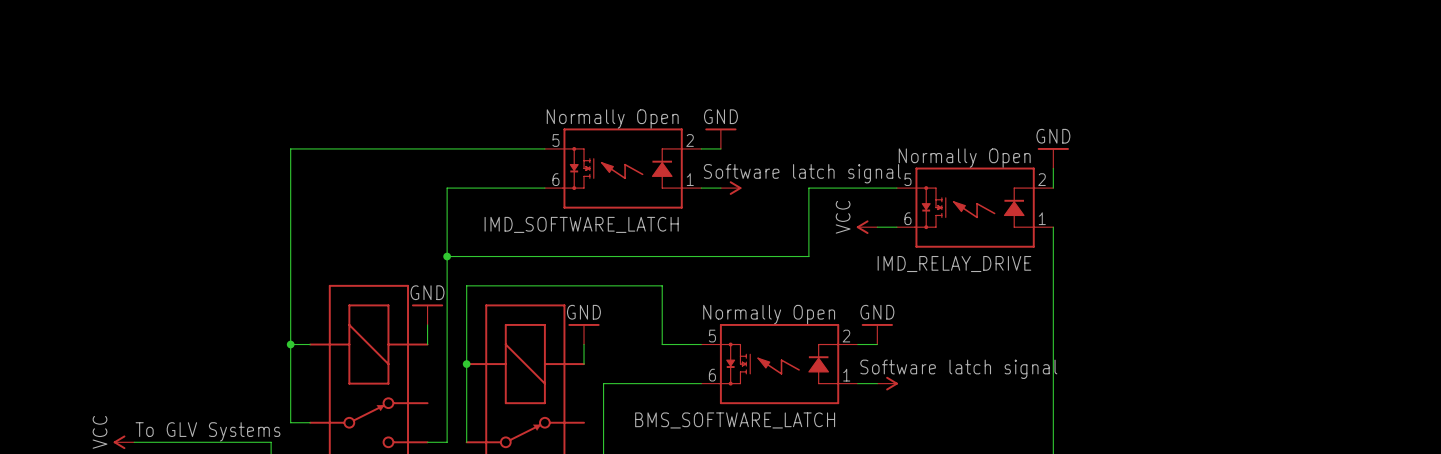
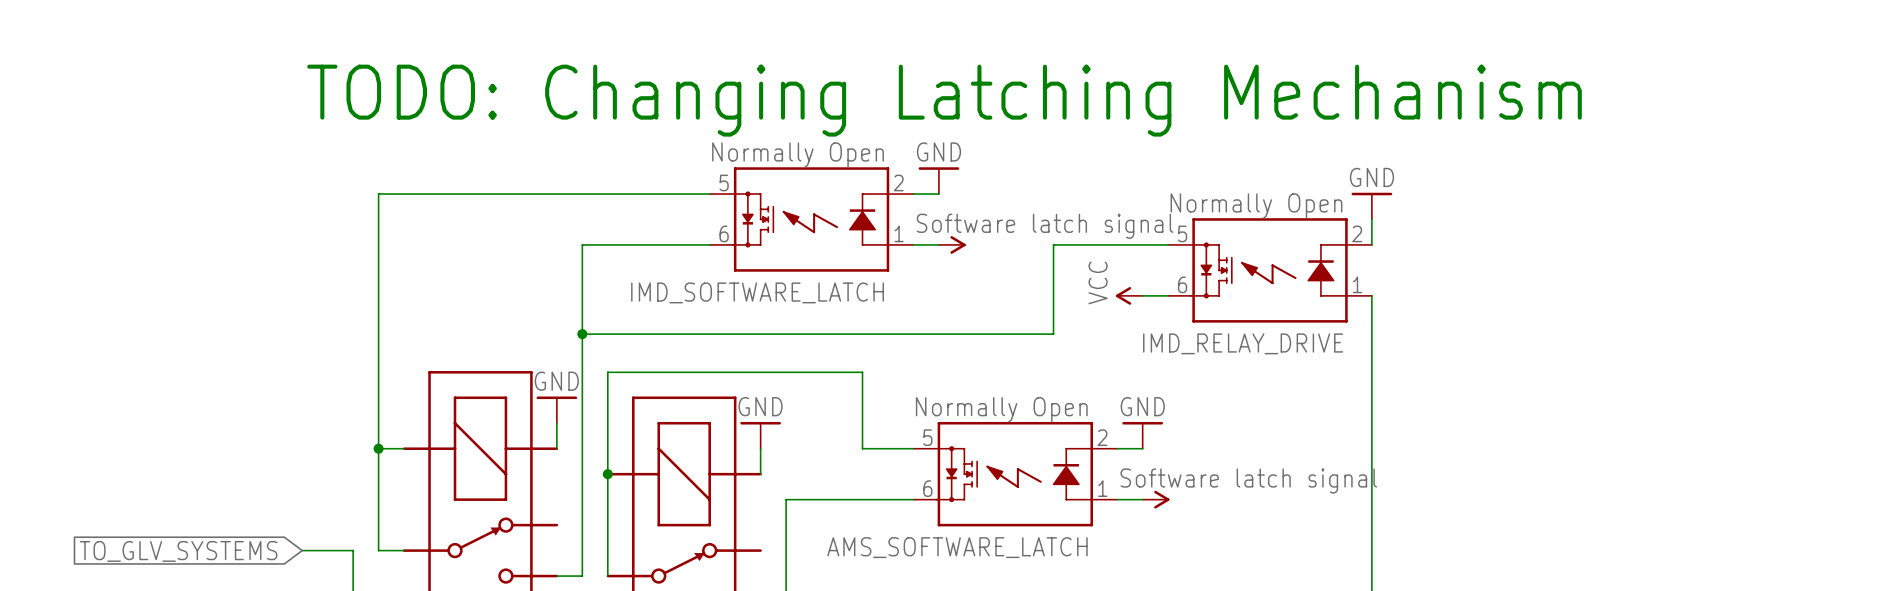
text: none -> TODO: Changing Latching Mechanism (944, 100)
BMS_SOFTWARE_LATCH name: BMS_SOFTWARE_LATCH (735, 420) -> AMS_SOFTWARE_LATCH (957, 547)
global label: none -> TO_GLV_SYSTEMS (178, 551)
text: To GLV Systems (207, 431) -> none
power symbol: VCC (123, 442) -> none
wire: (134, 442) (271, 442) -> (302, 550) (353, 550) (353, 576)

